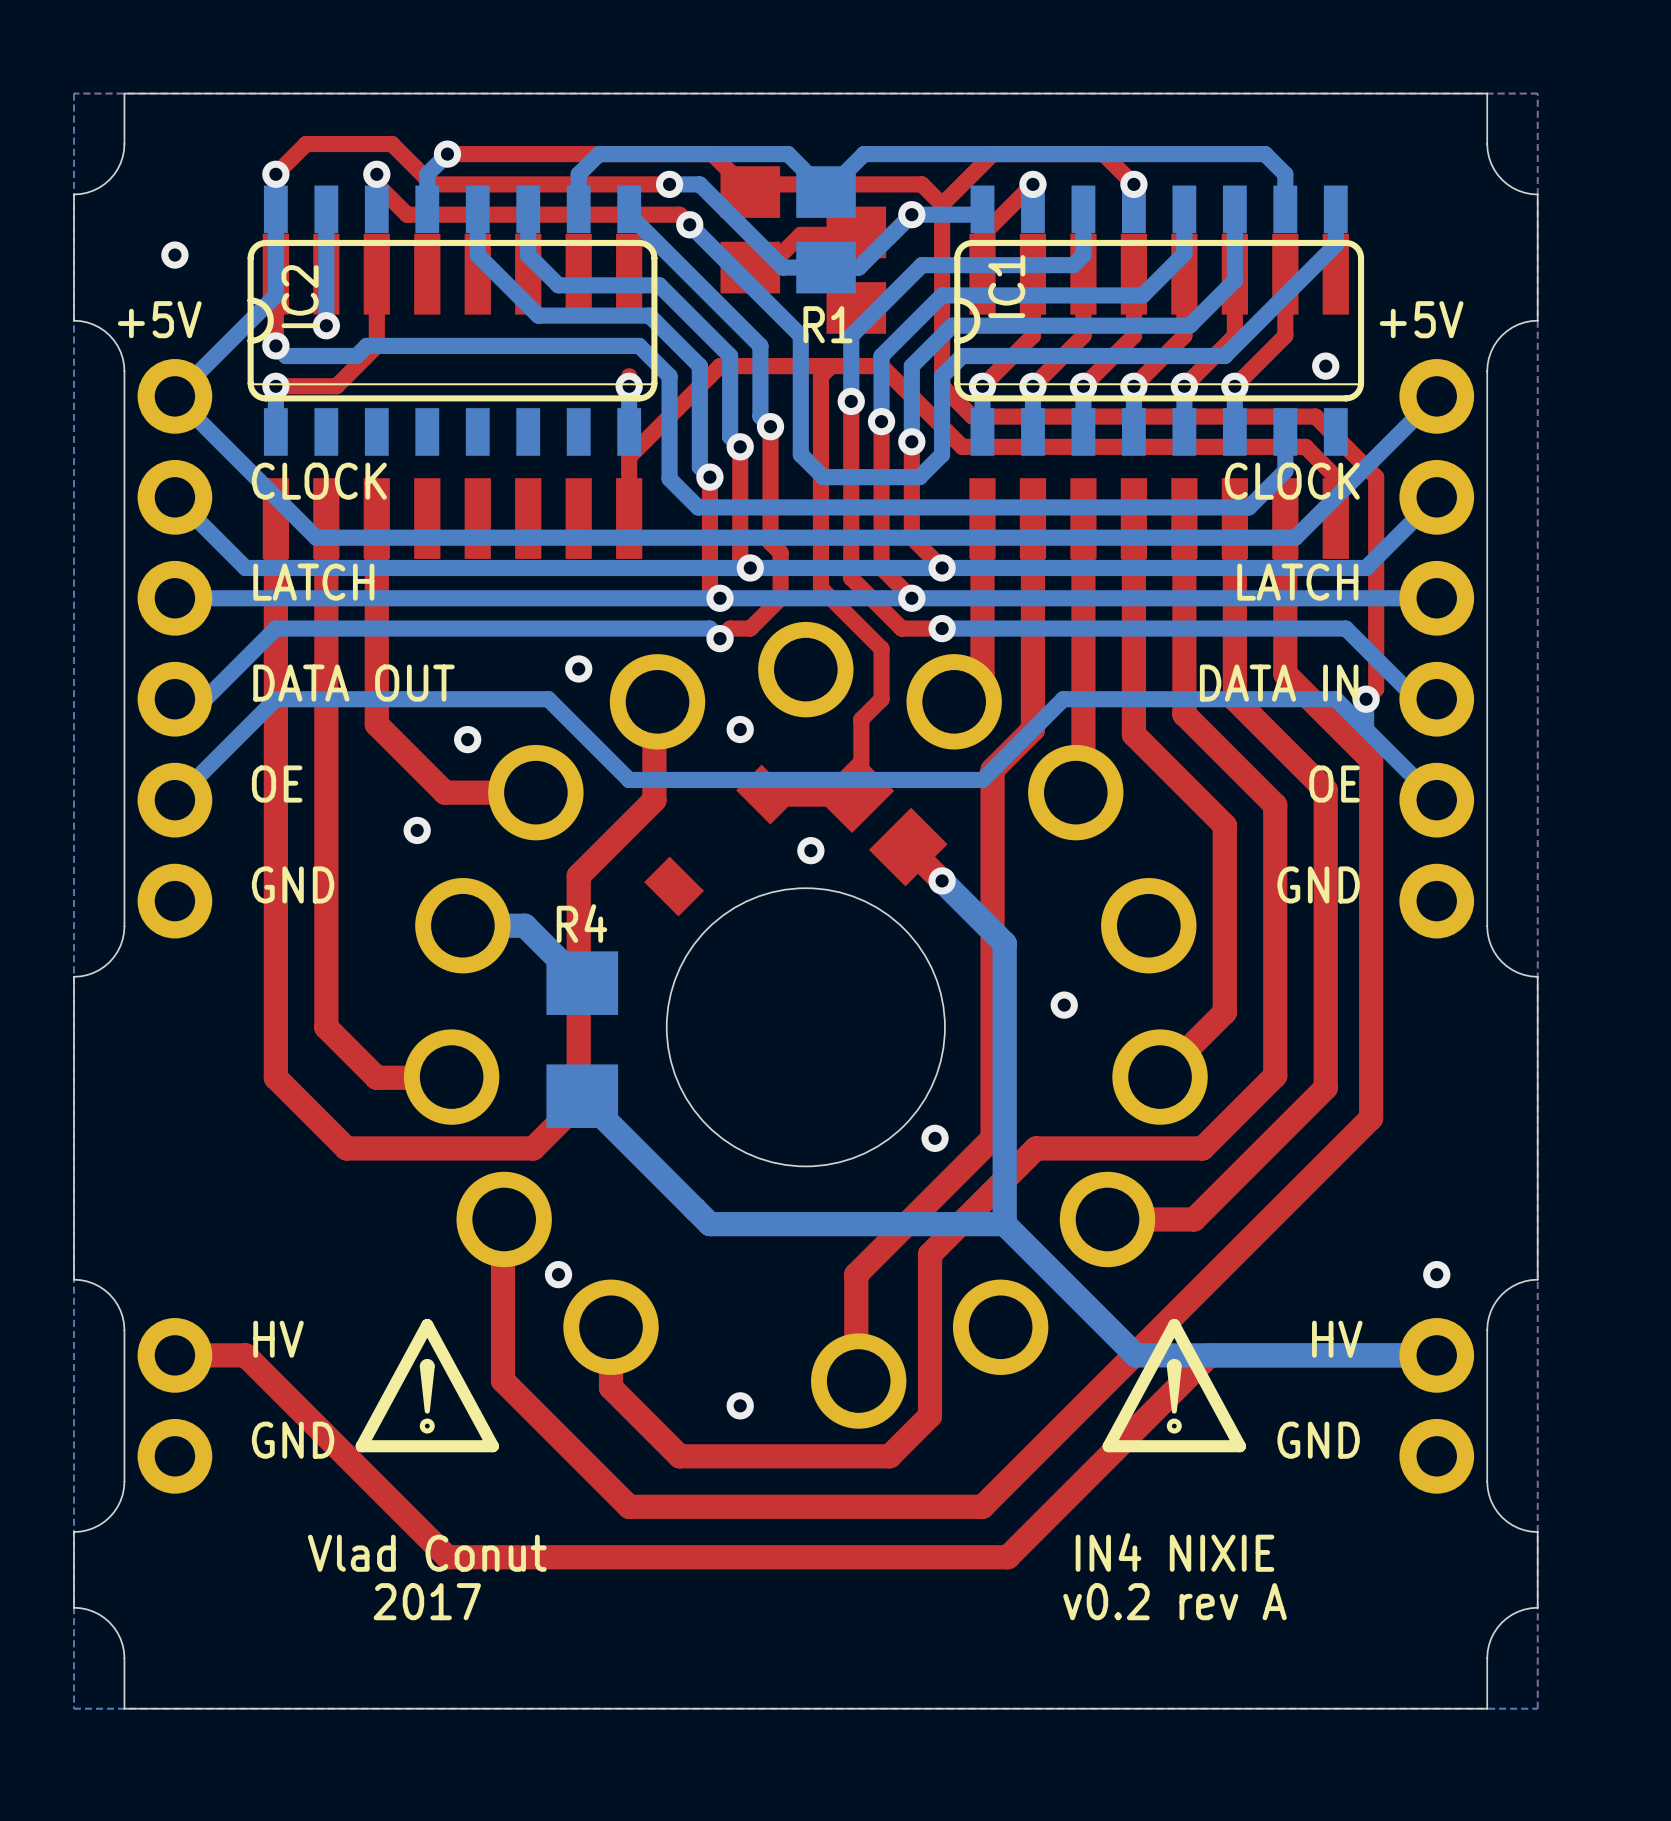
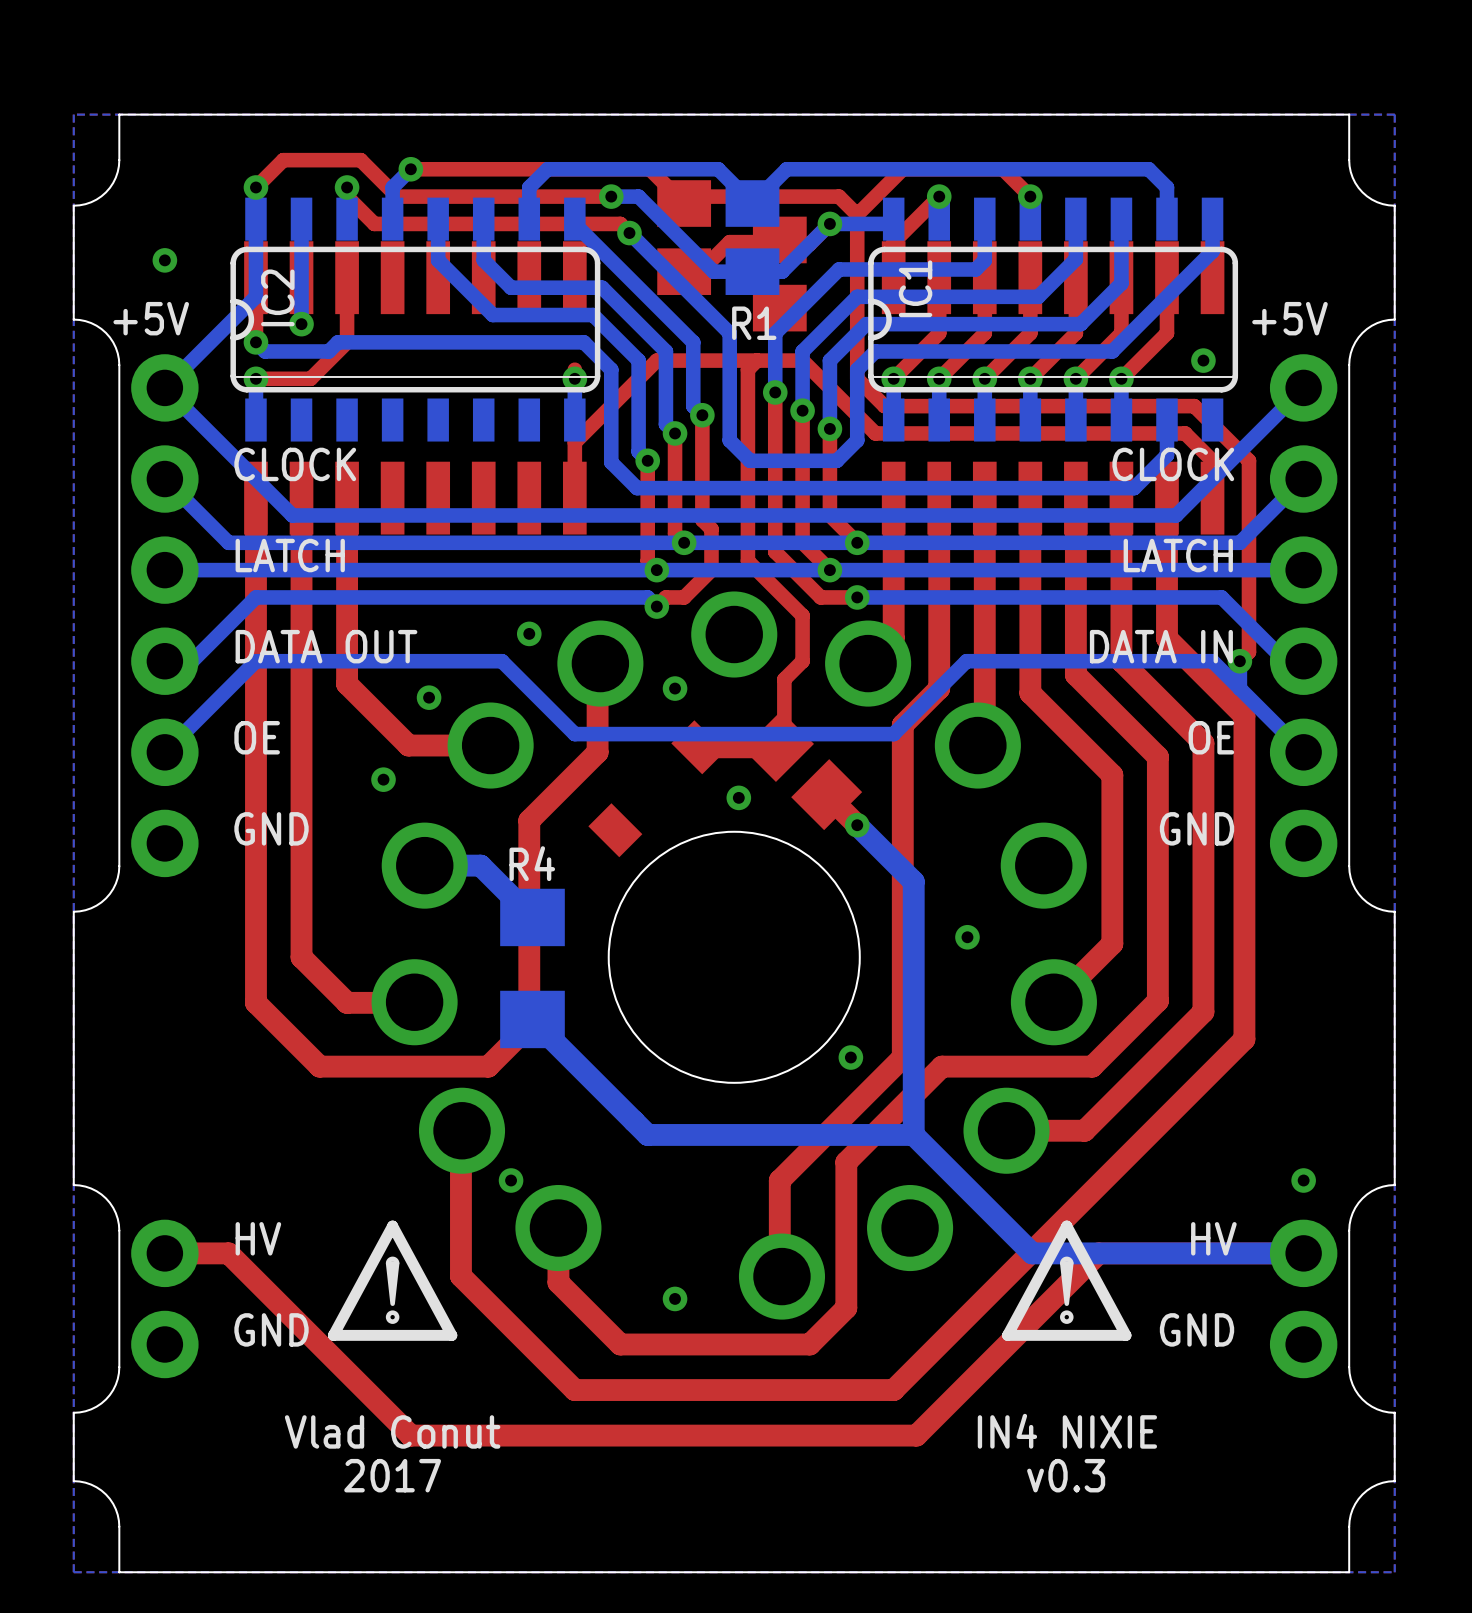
text: v0.2 rev A (1174, 1601) -> v0.3 (1066, 1475)

